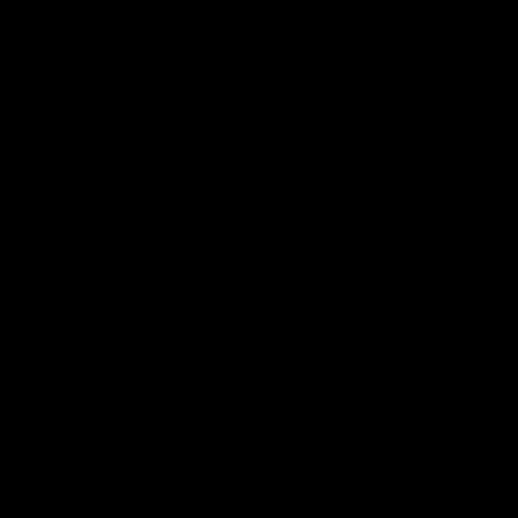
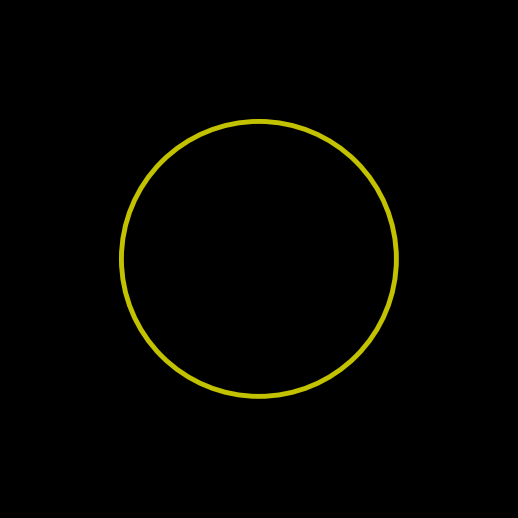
round board edge: none -> [118, 118, 399, 399]

